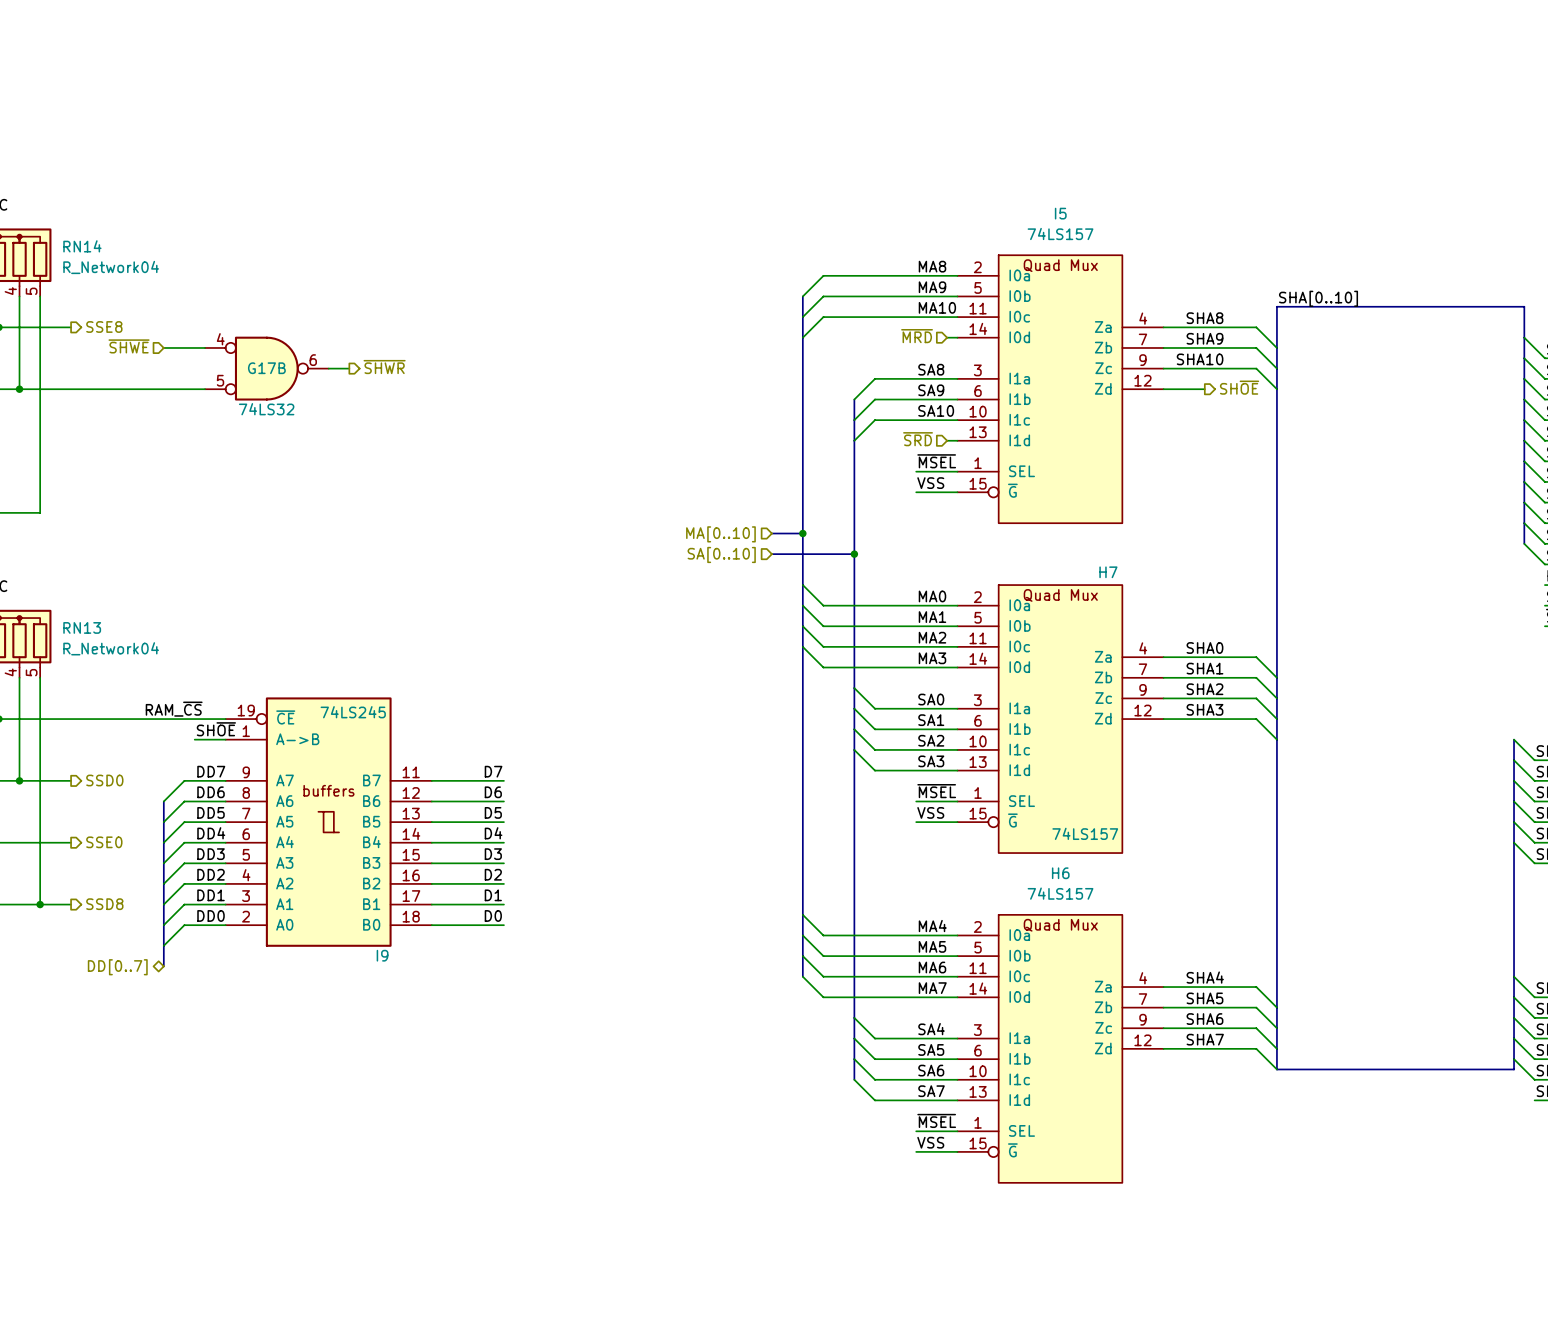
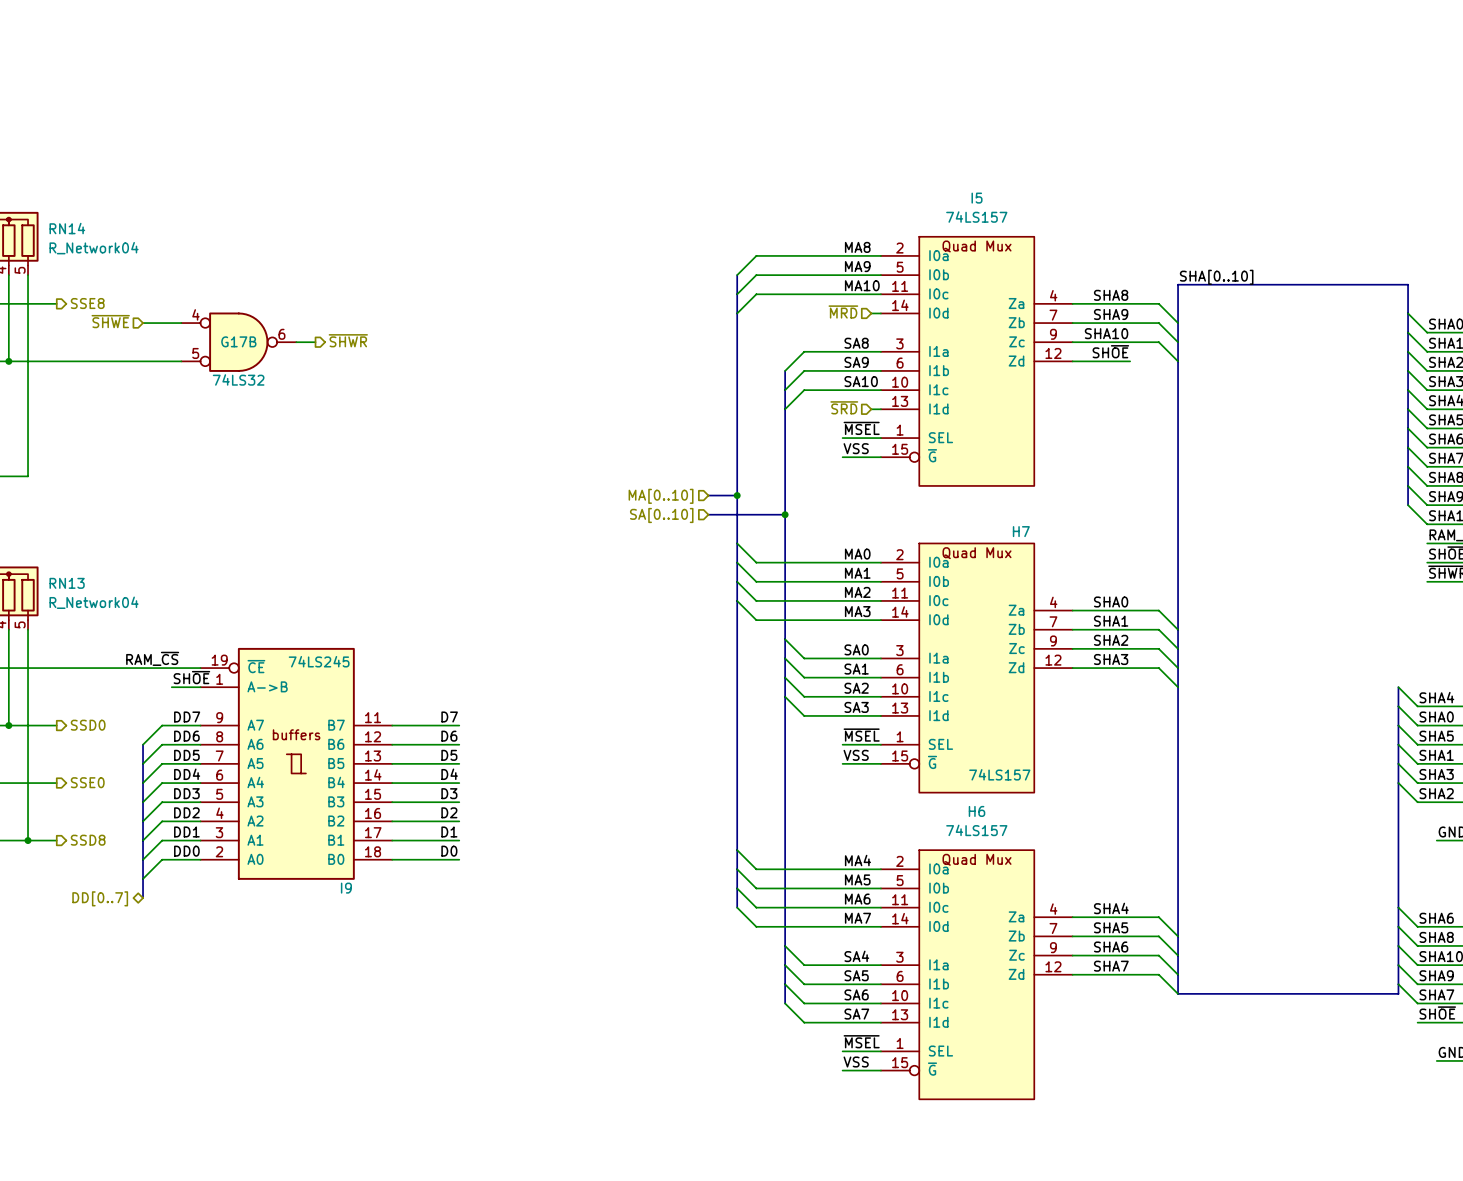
label: none -> SH~{OE} (1110, 351)
hierarchical label: SH~{OE} (1239, 387) -> none
wire: none -> (1110, 361) (1130, 361)

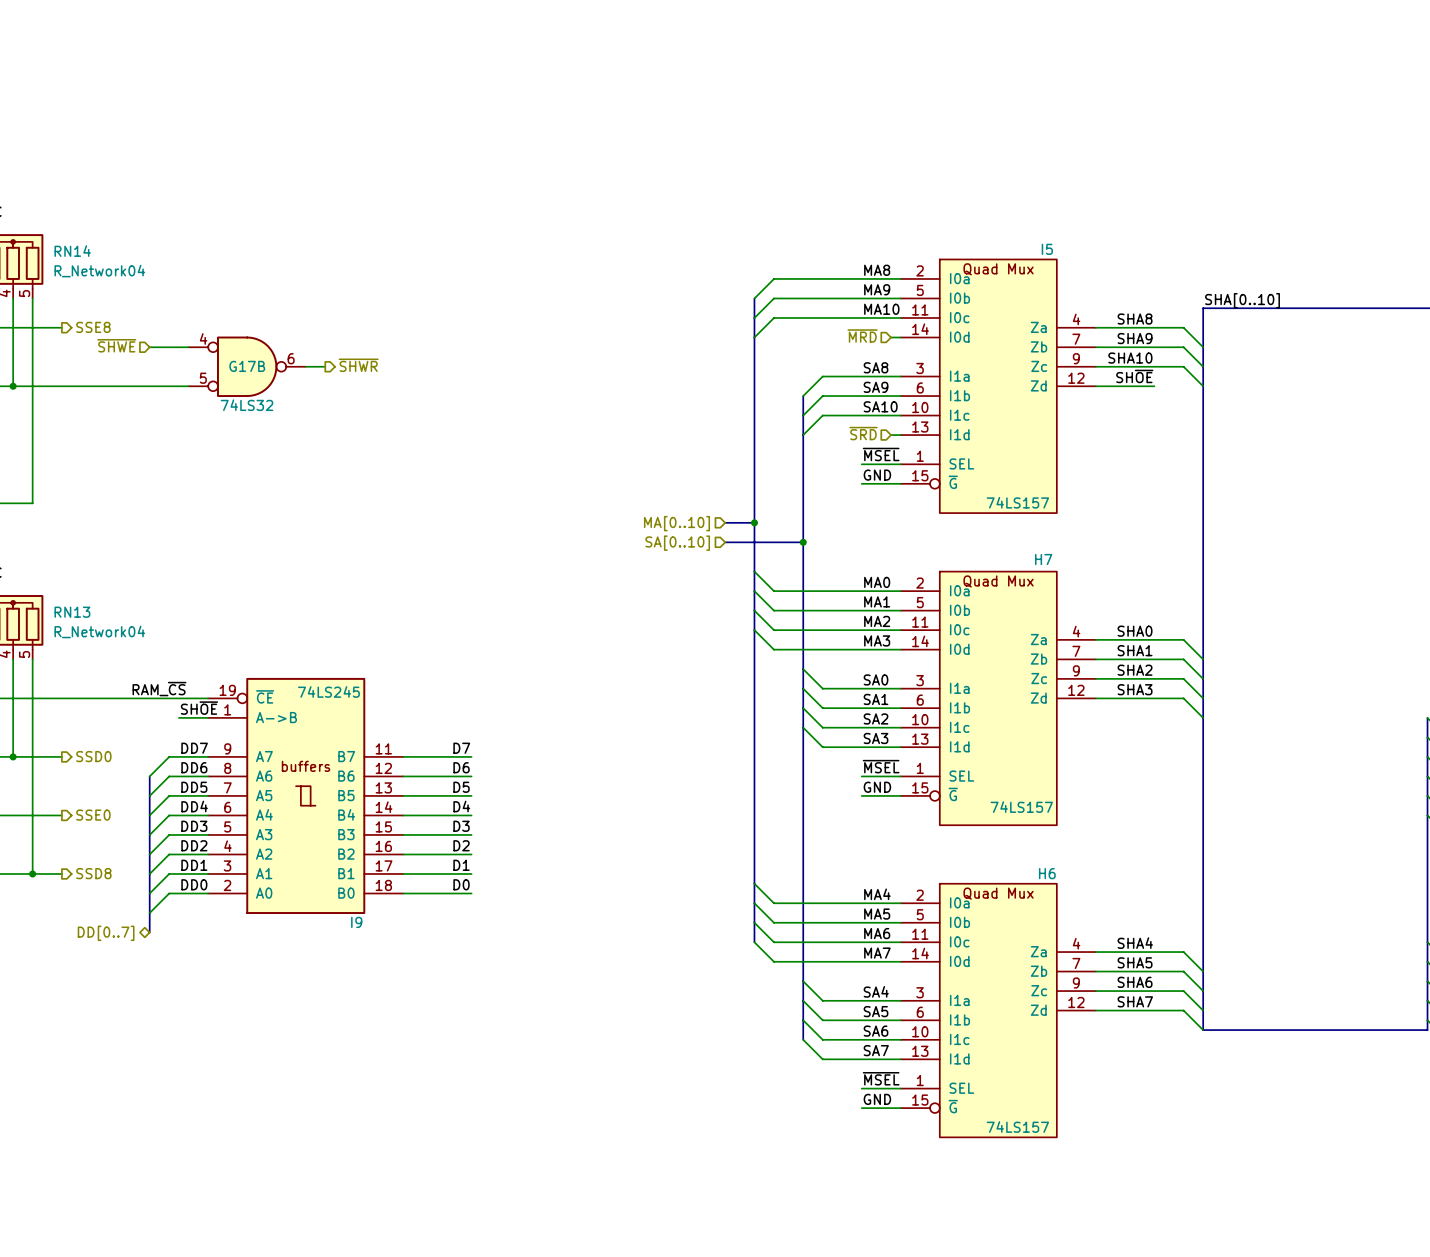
I5 name position: I5 (977, 198) -> I5 (1047, 249)
I5 value position: 74LS157 (976, 217) -> 74LS157 (1017, 502)
label: VSS (856, 448) -> GND (877, 475)
label: VSS (856, 755) -> GND (877, 787)
H6 name position: H6 (977, 811) -> H6 (1047, 873)
H6 value position: 74LS157 (976, 830) -> 74LS157 (1017, 1127)
label: VSS (856, 1062) -> GND (877, 1099)

